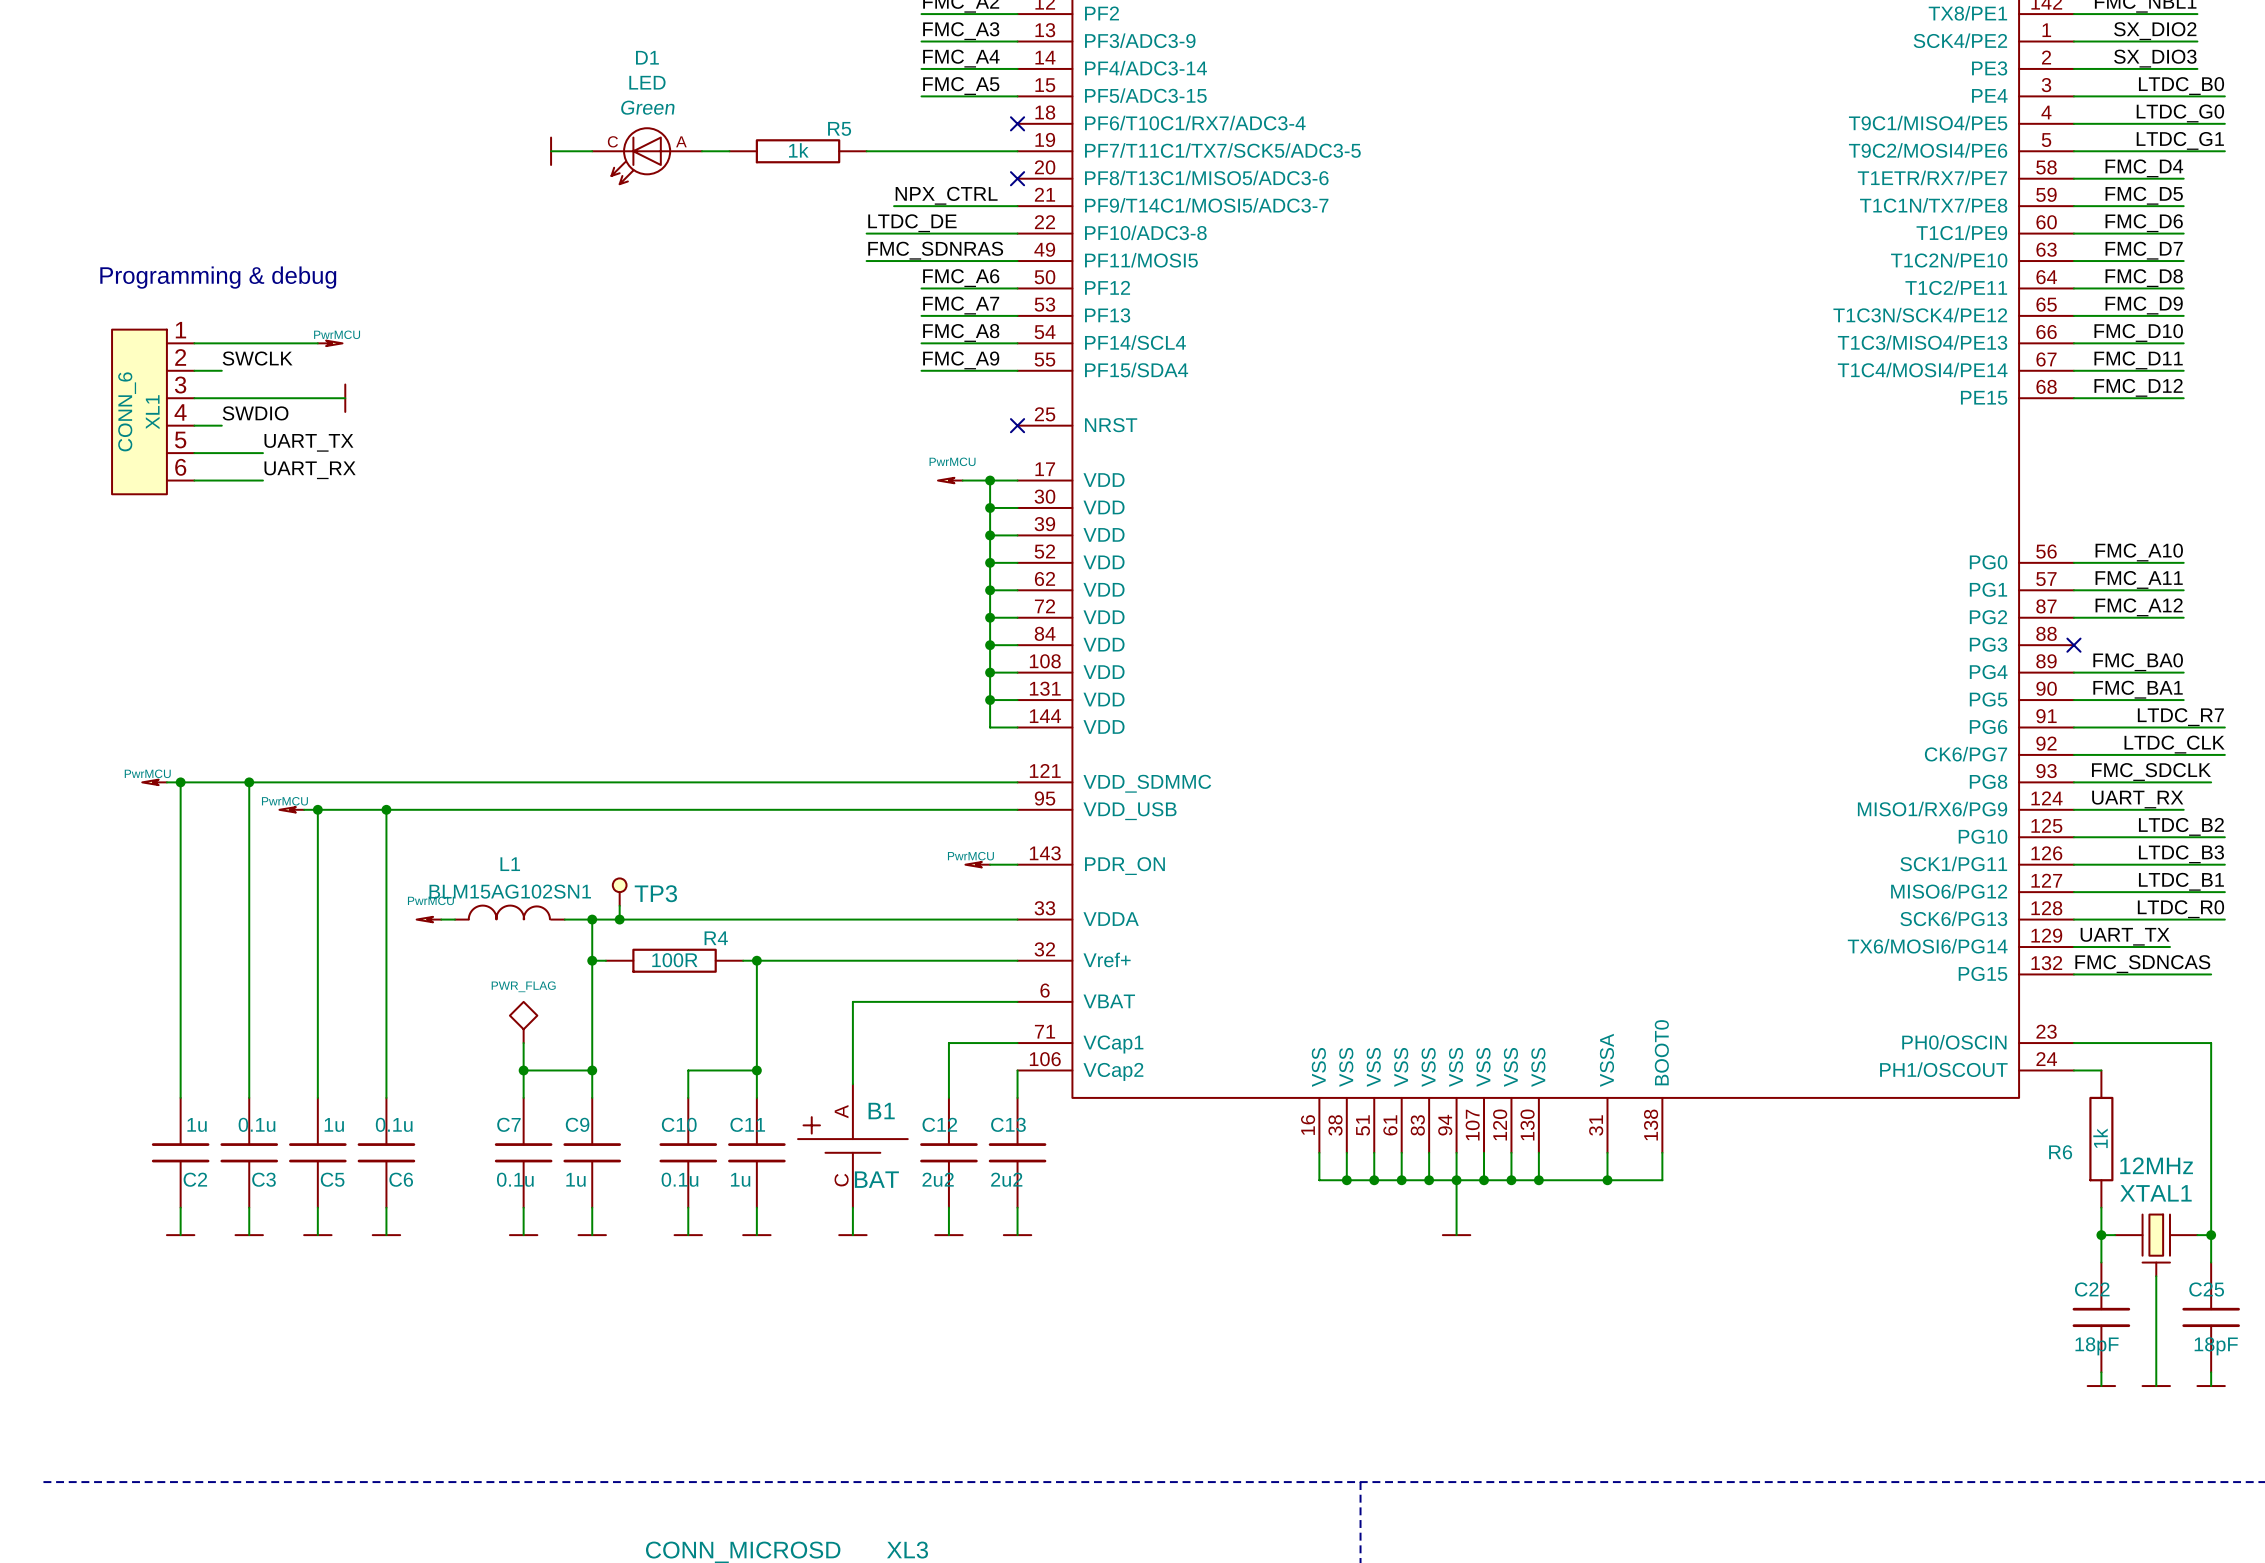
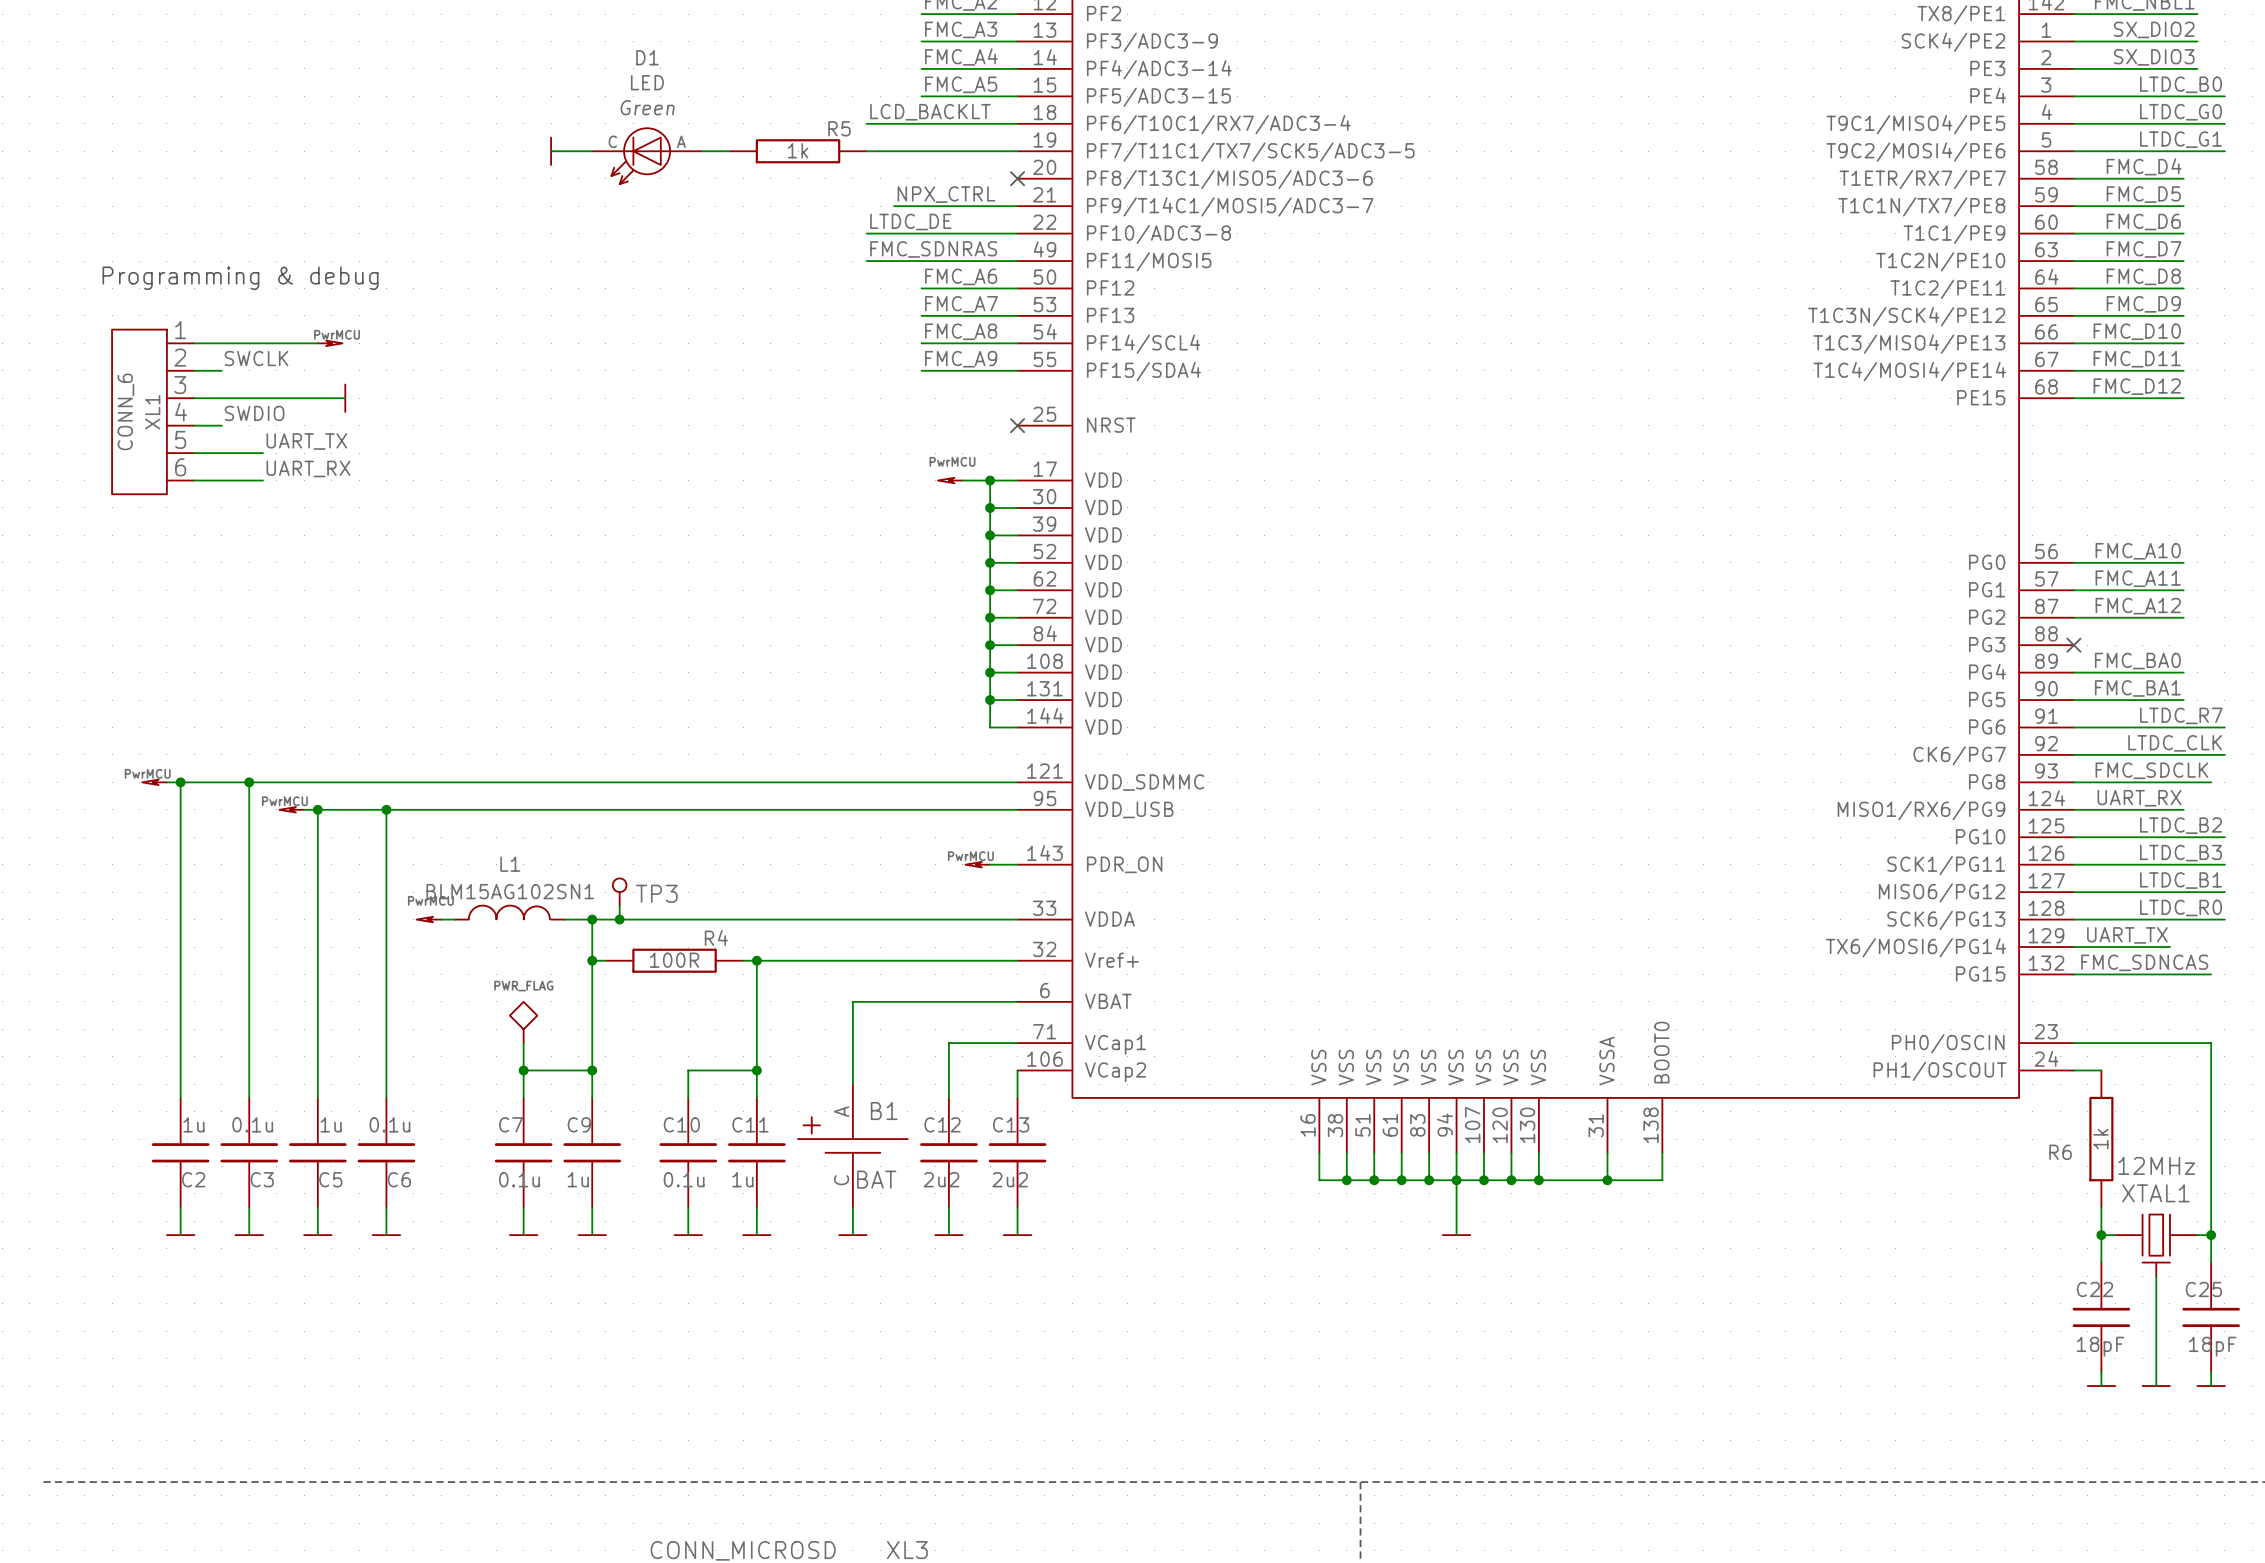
label: none -> LCD_BACKLT (930, 112)
wire: none -> (866, 123) (1017, 123)
no-connect mark: (1017, 123) -> none

